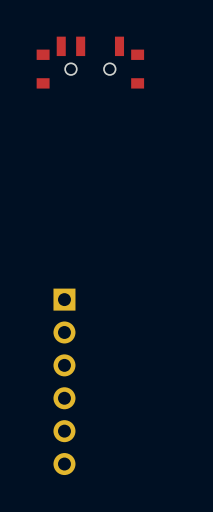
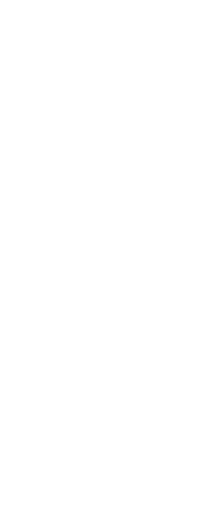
part: (90, 62) -> none
part: (64, 381) -> none

